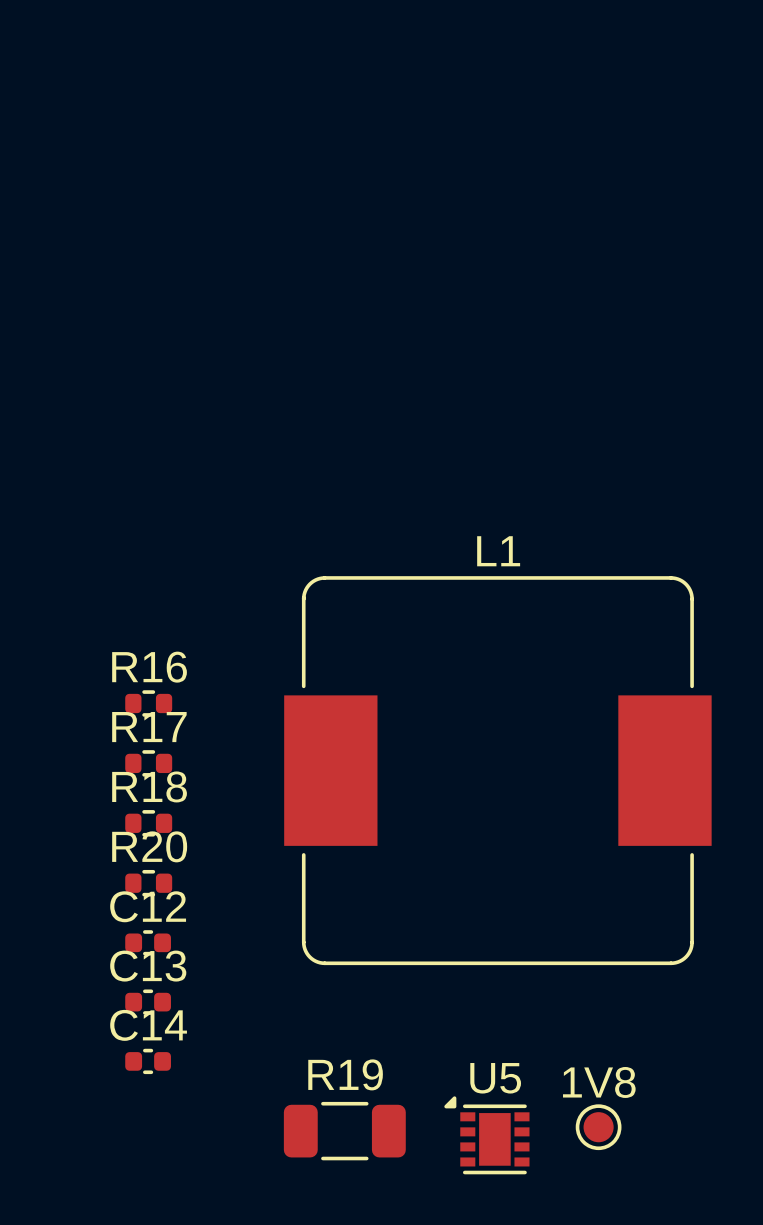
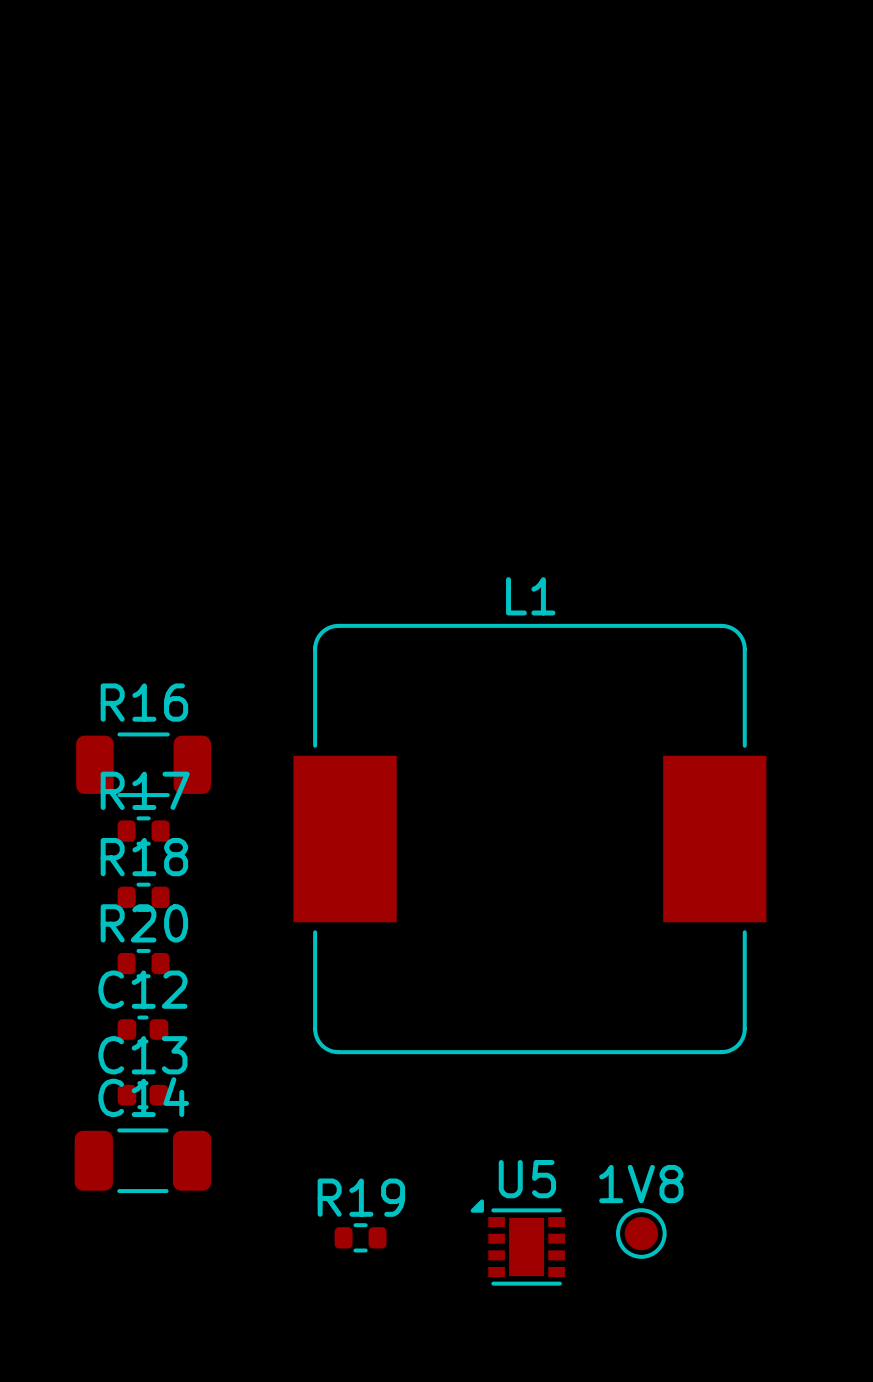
R16 footprint: [125, 690, 173, 717] -> [76, 732, 212, 798]
C14 footprint: [125, 1048, 171, 1075] -> [74, 1128, 212, 1194]
R19 footprint: [283, 1101, 406, 1161] -> [334, 1223, 387, 1253]

